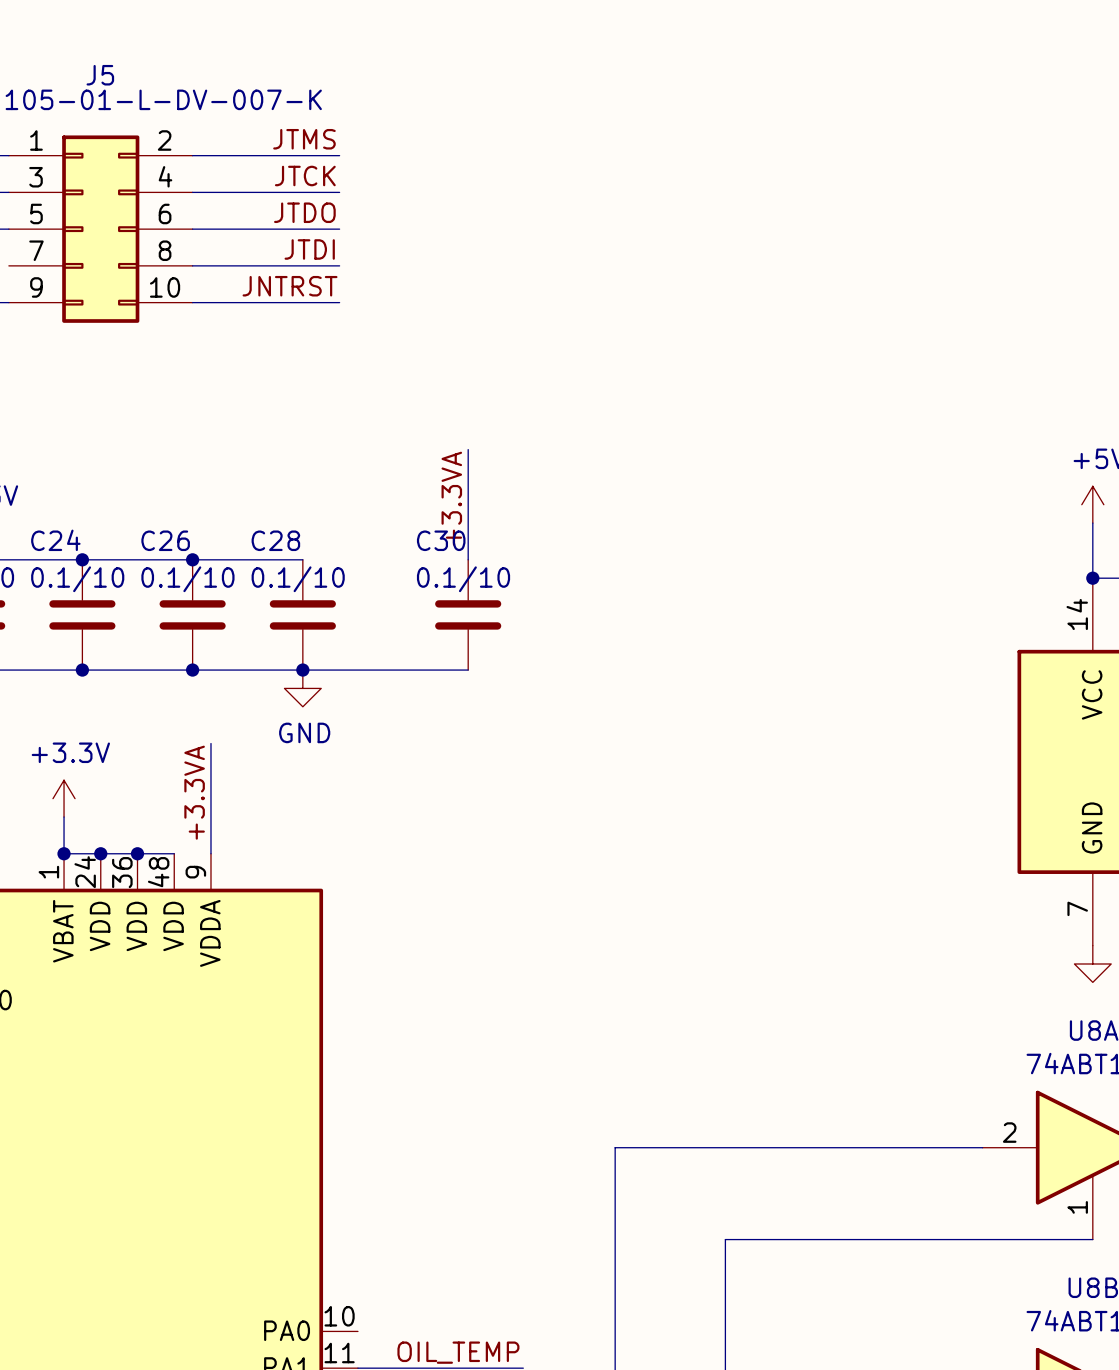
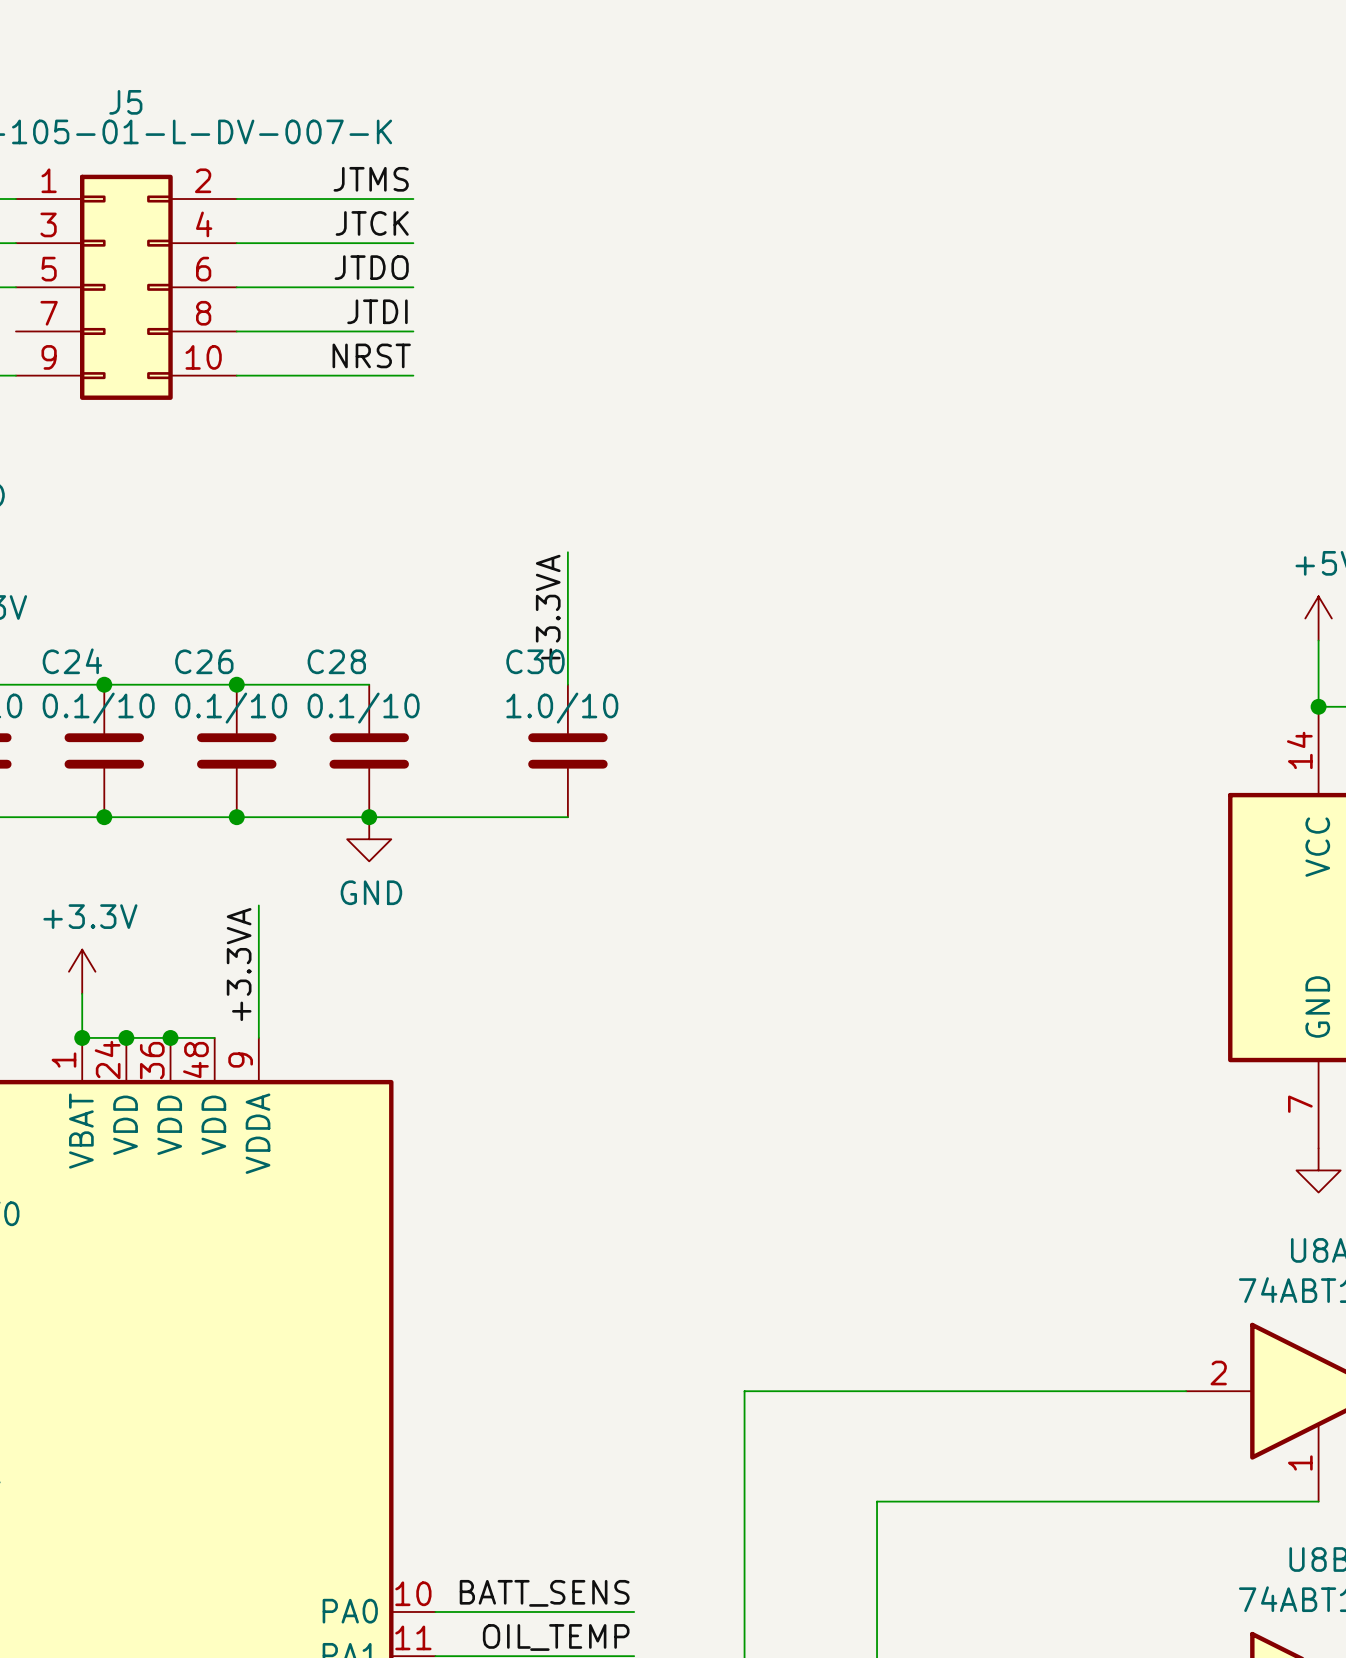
label: JNTRST (290, 286) -> NRST (371, 355)
C30 value: 0.1/10 (463, 579) -> 1.0/10 (562, 708)
label: none -> BATT_SENS (544, 1593)
wire: none -> (435, 1611) (634, 1611)

